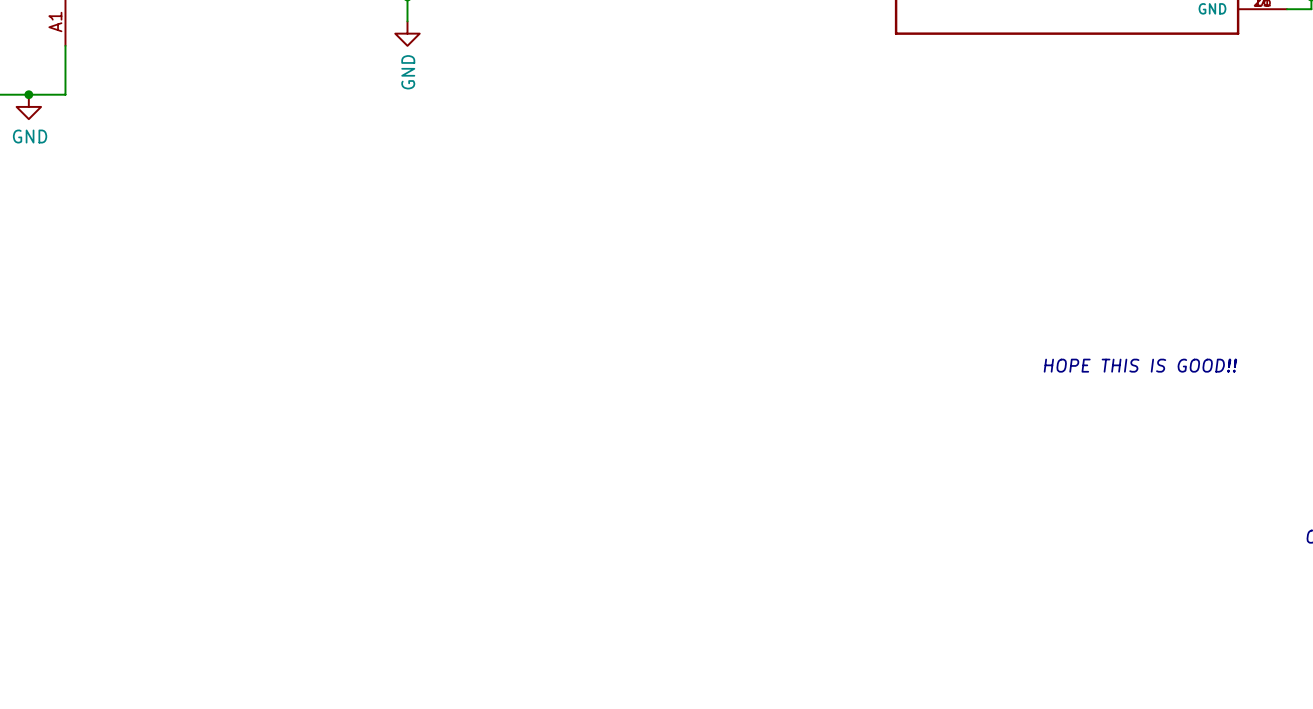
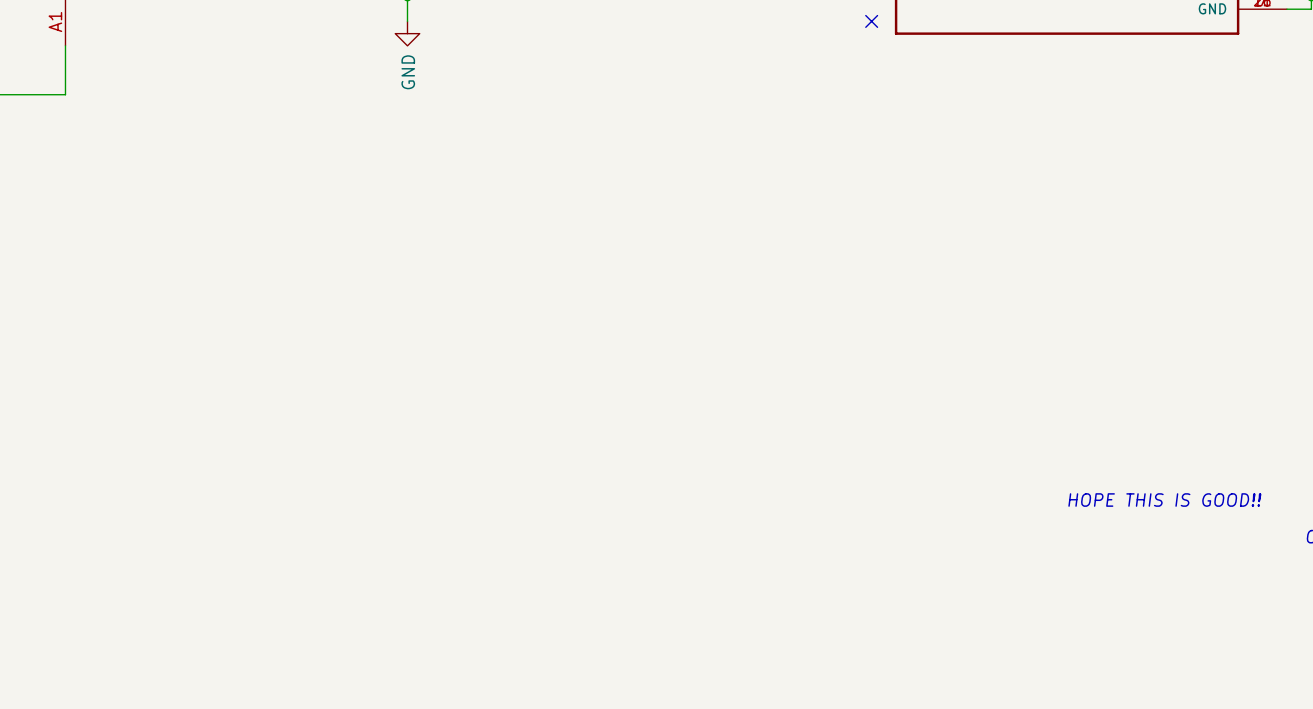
no-connect mark: none -> (871, 21)
junction: (28, 94) -> none
power symbol: GND (28, 106) -> none
text position: HOPE THIS IS GOOD!! (1140, 365) -> HOPE THIS IS GOOD!! (1164, 500)

